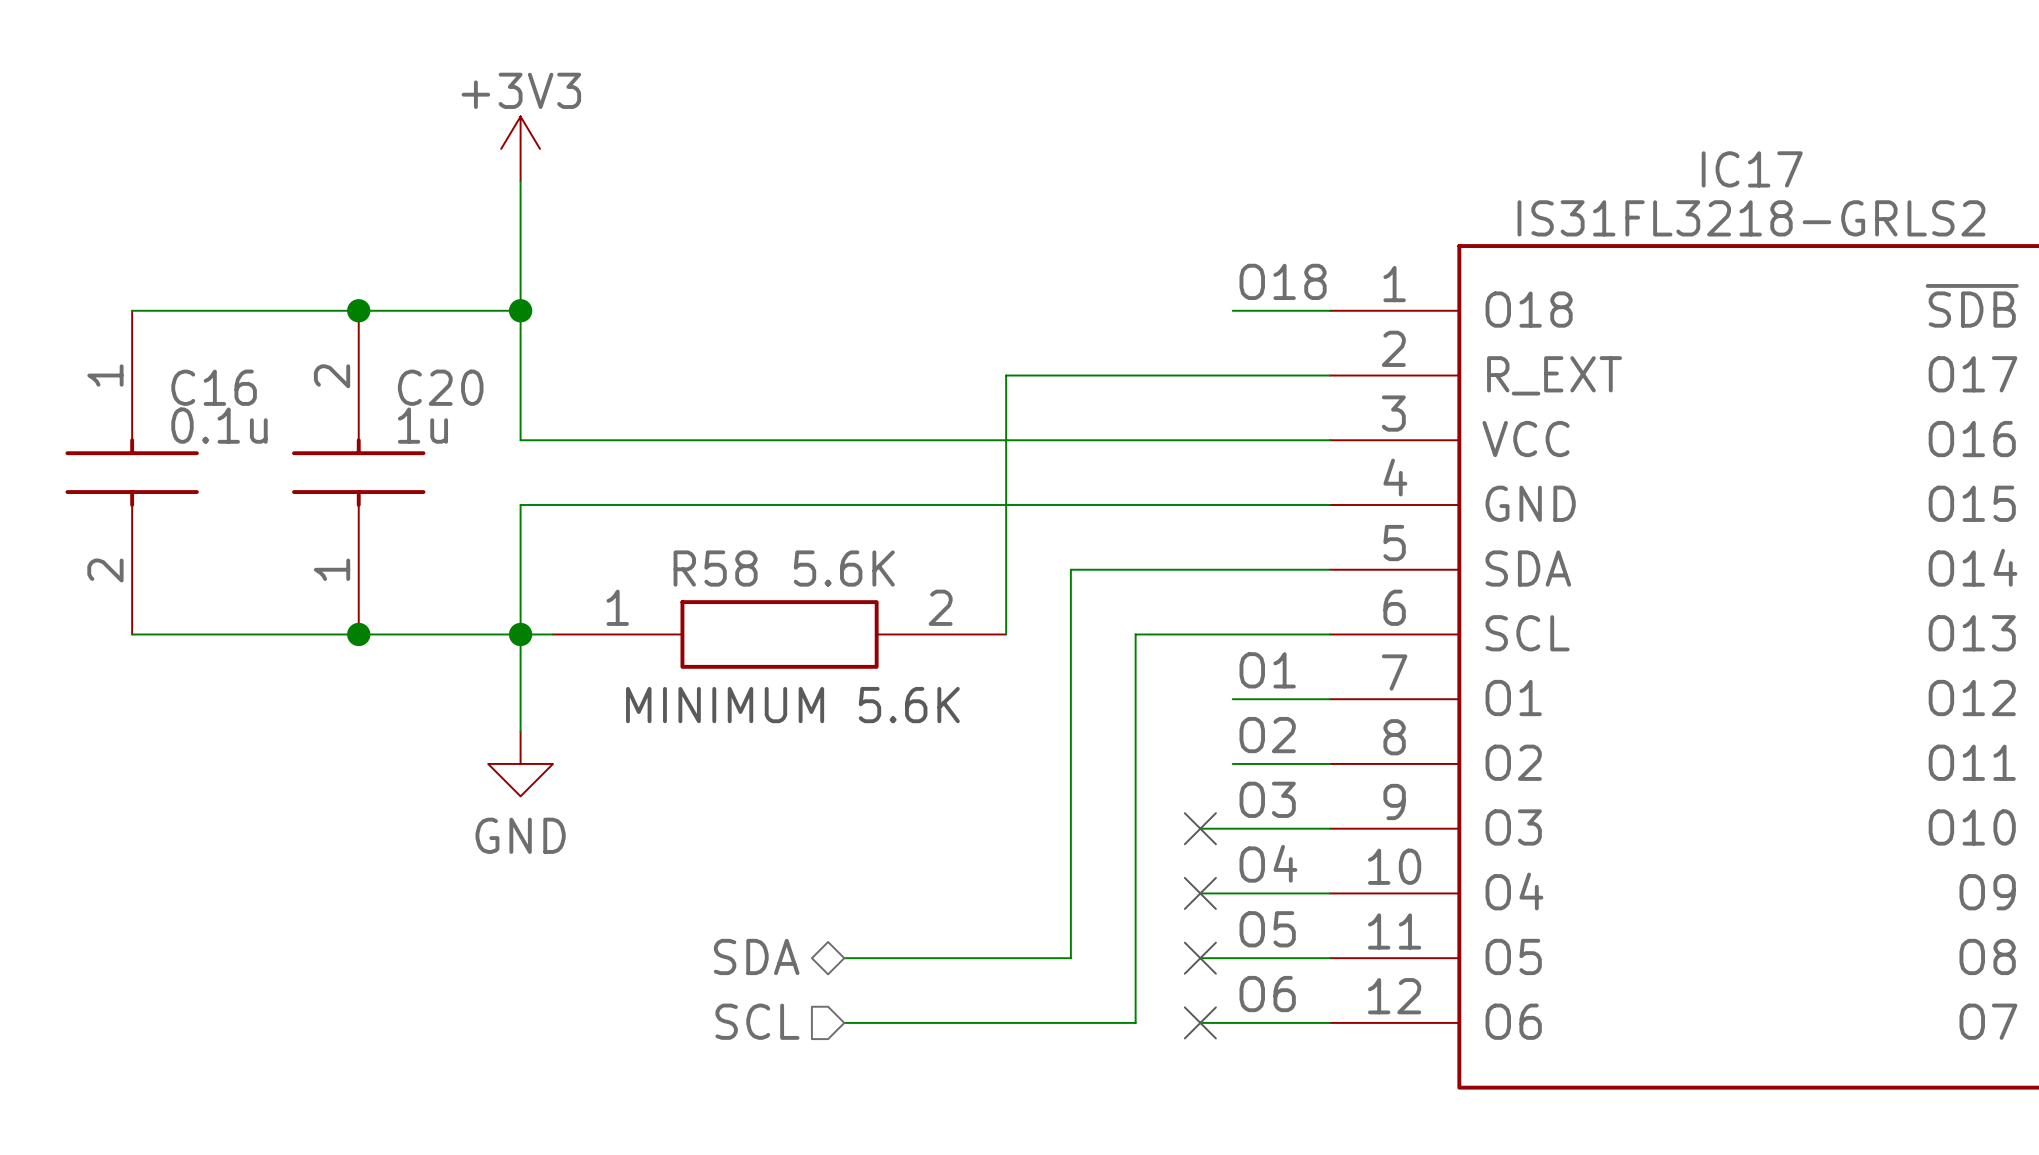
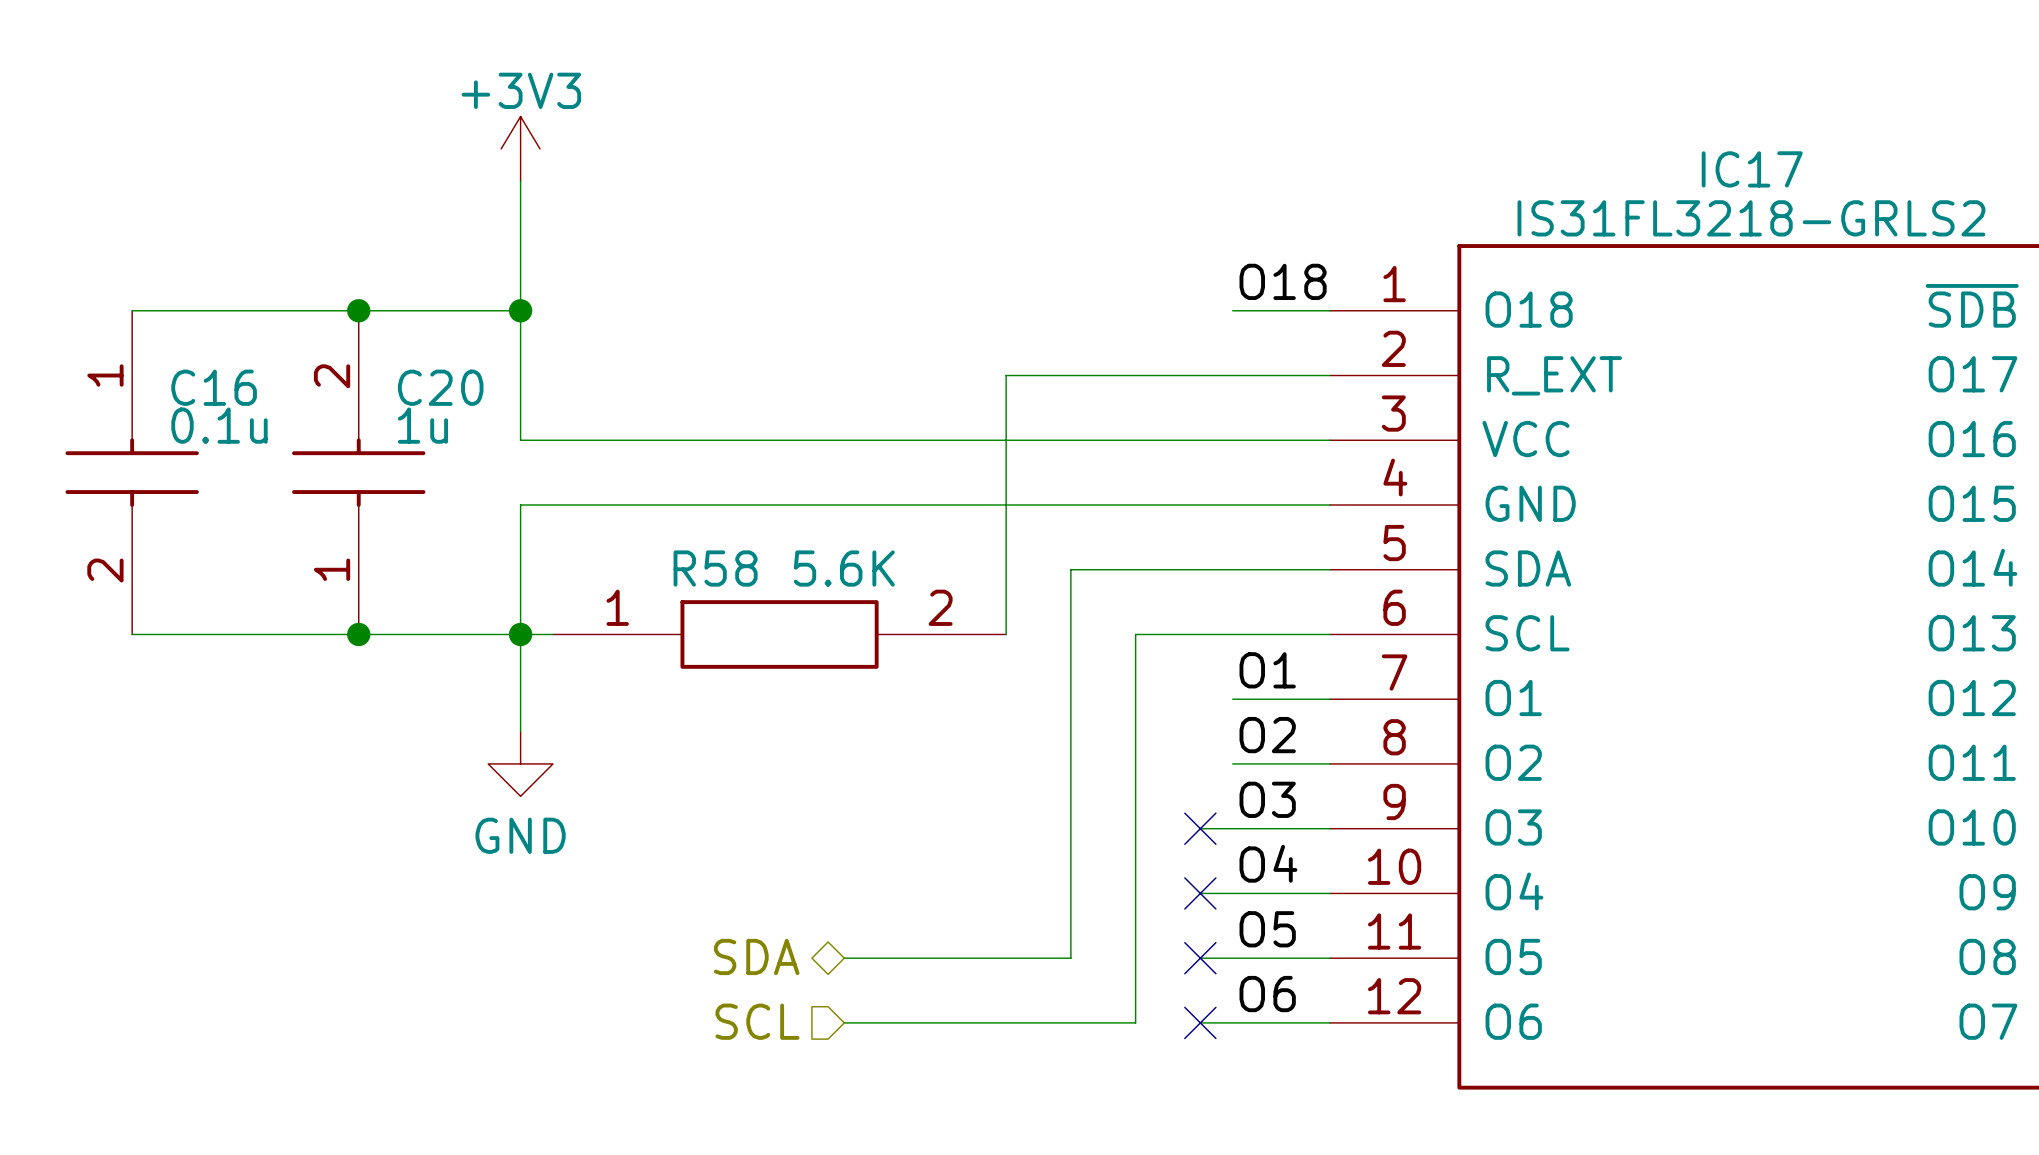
text: MINIMUM 5.6K (792, 705) -> none

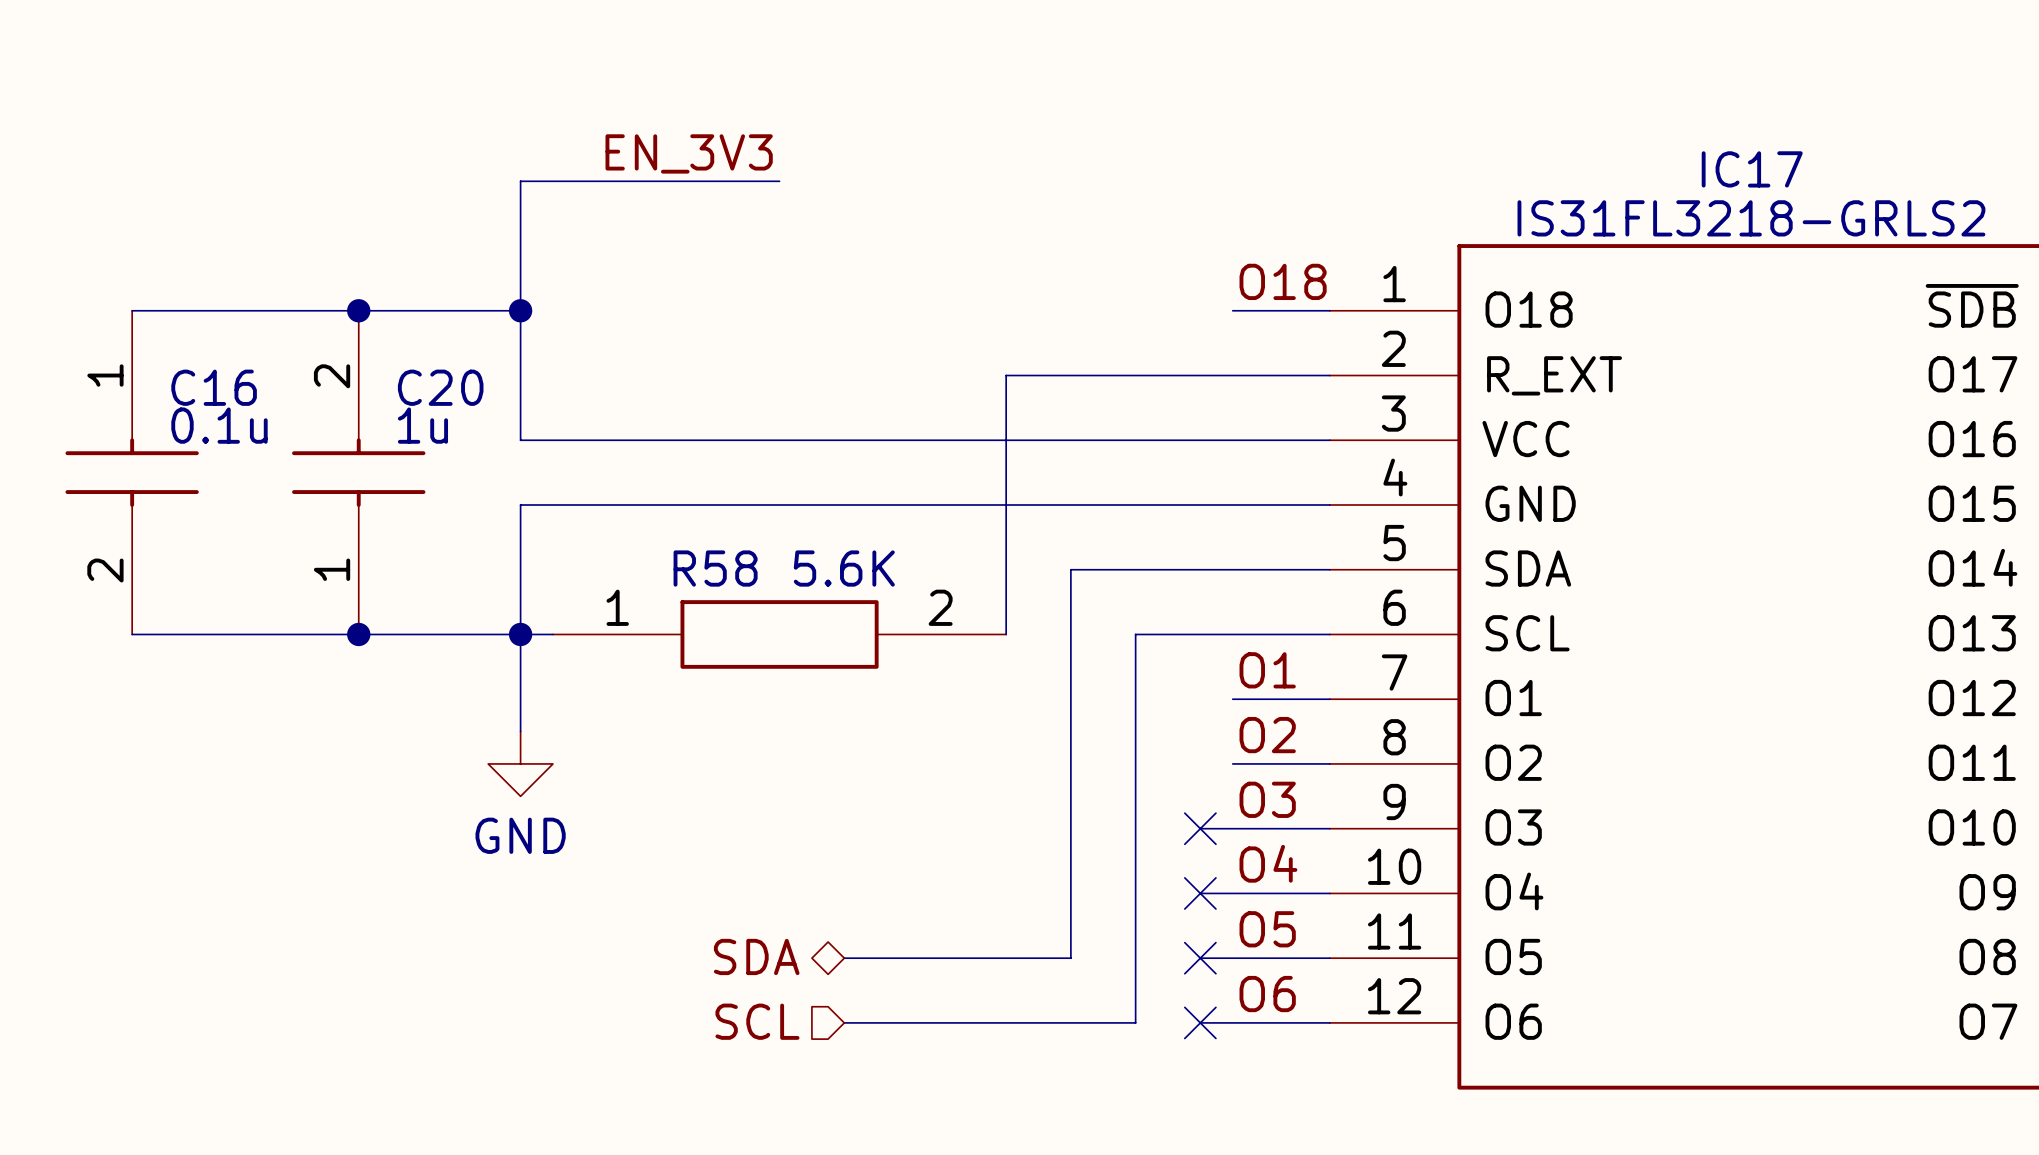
power symbol: +3V3 (520, 148) -> none
label: none -> EN_3V3 (689, 153)
wire: none -> (520, 181) (779, 181)

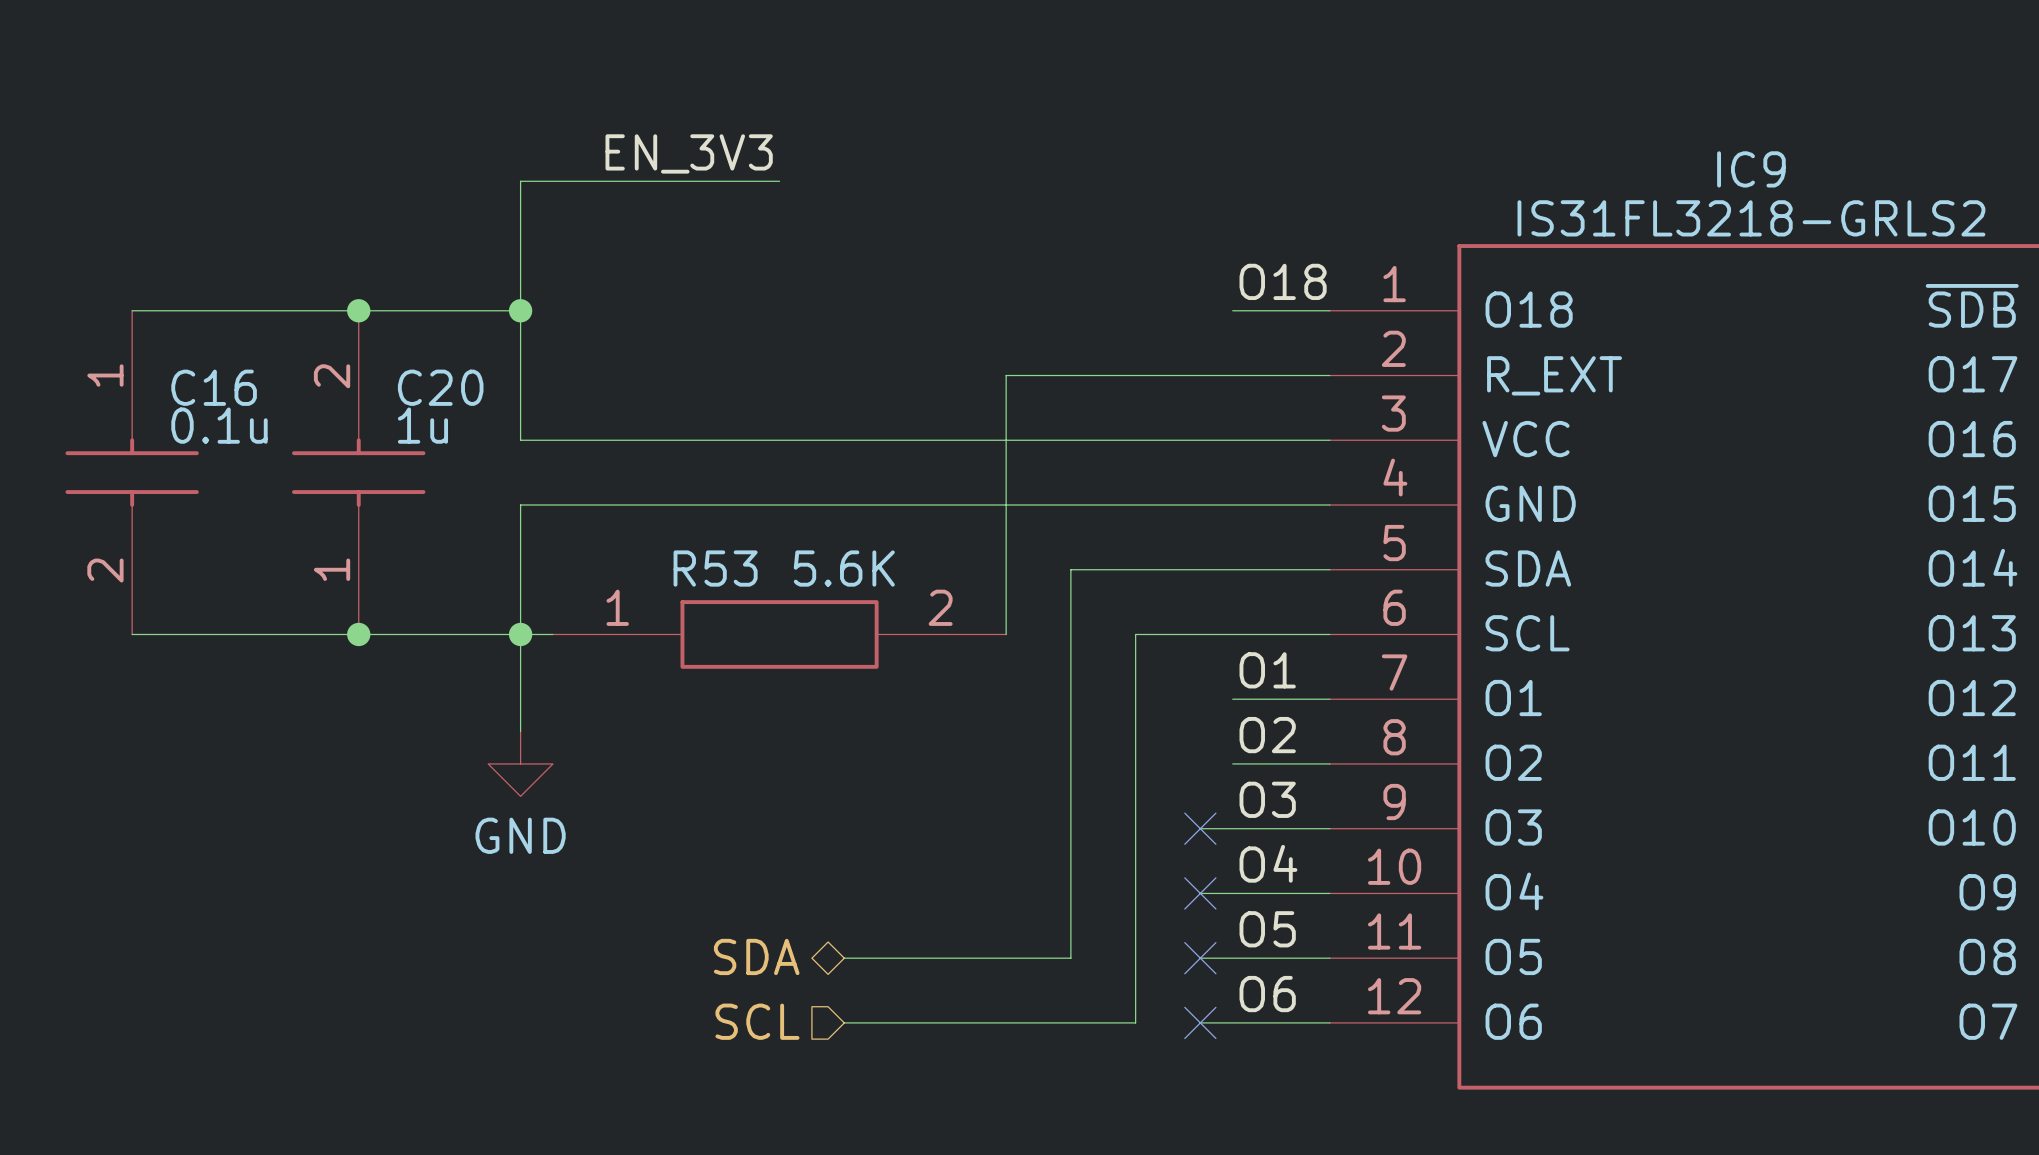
IC17 name: IC17 (1752, 169) -> IC9 (1751, 169)
R58 name: R58 (715, 568) -> R53 (715, 568)

